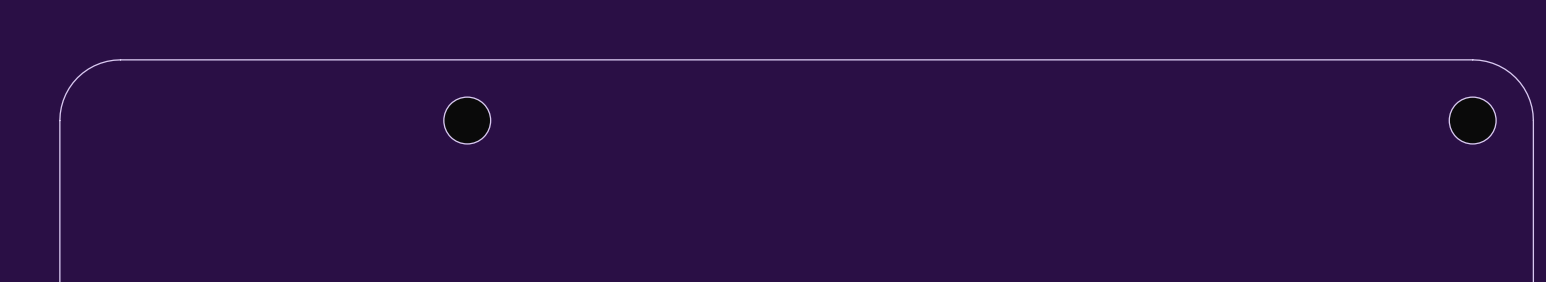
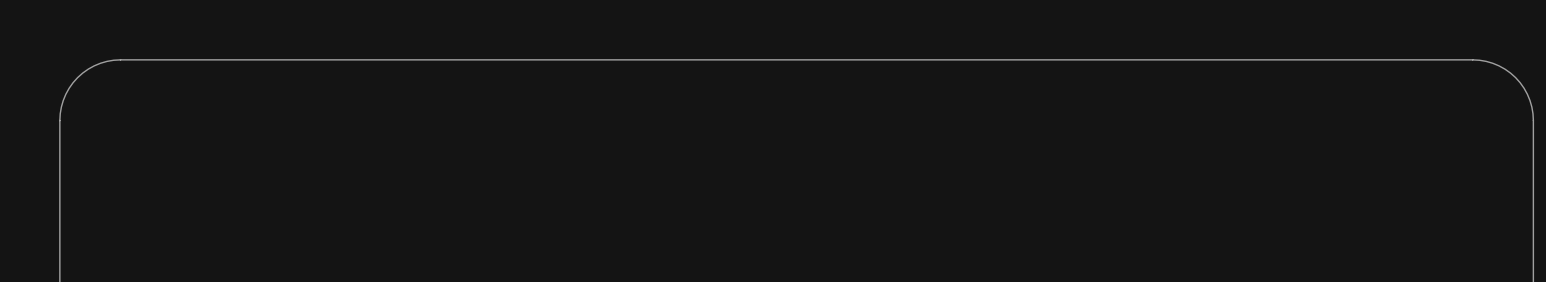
part: (467, 120) -> none
part: (1472, 120) -> none

